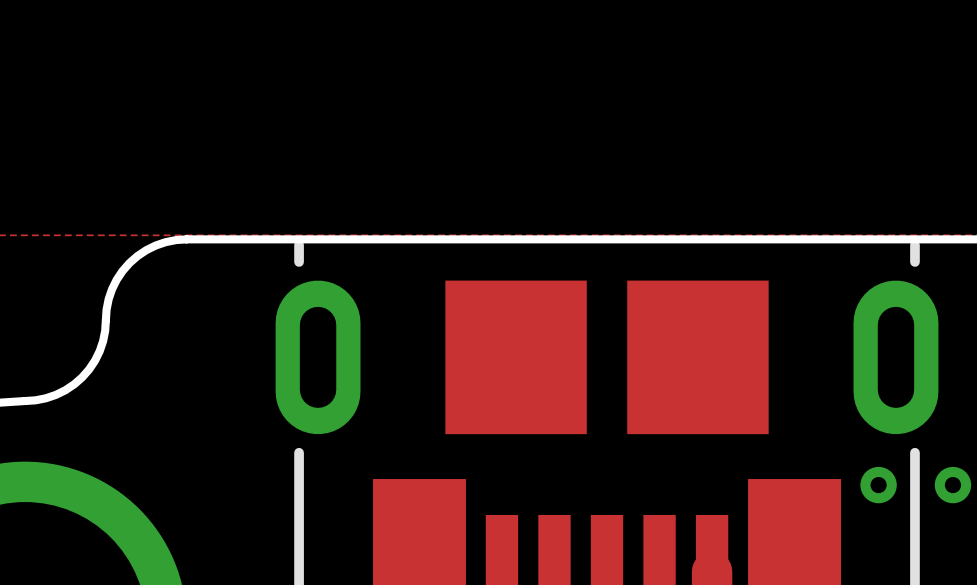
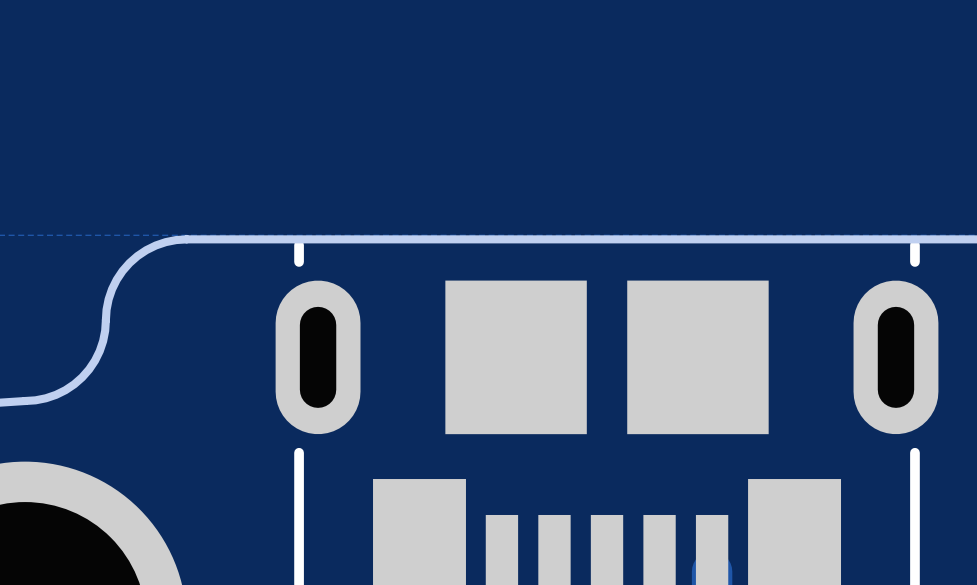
via: (878, 485) -> none
via: (952, 485) -> none

